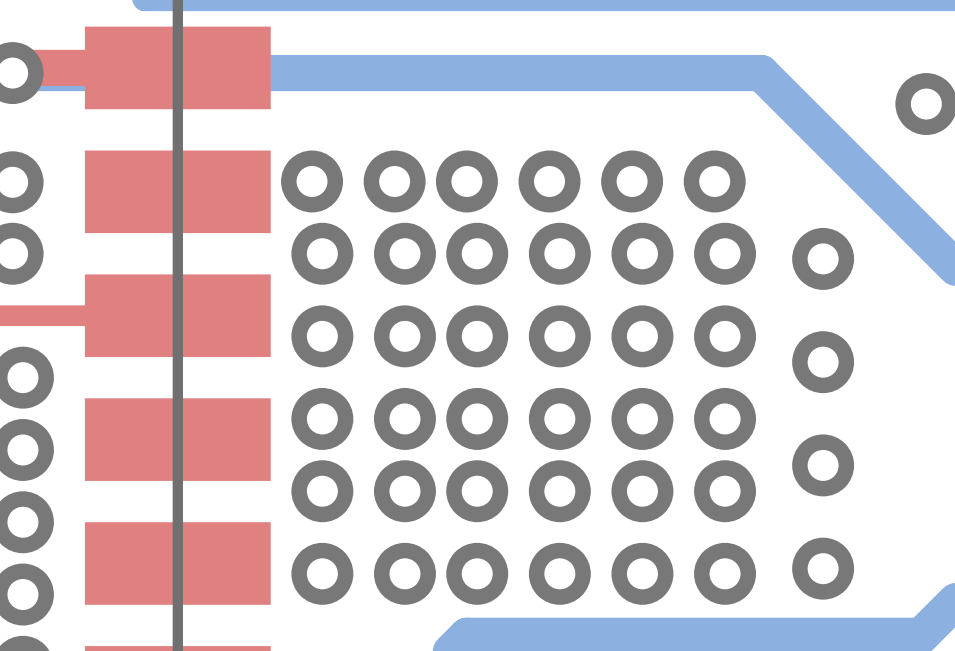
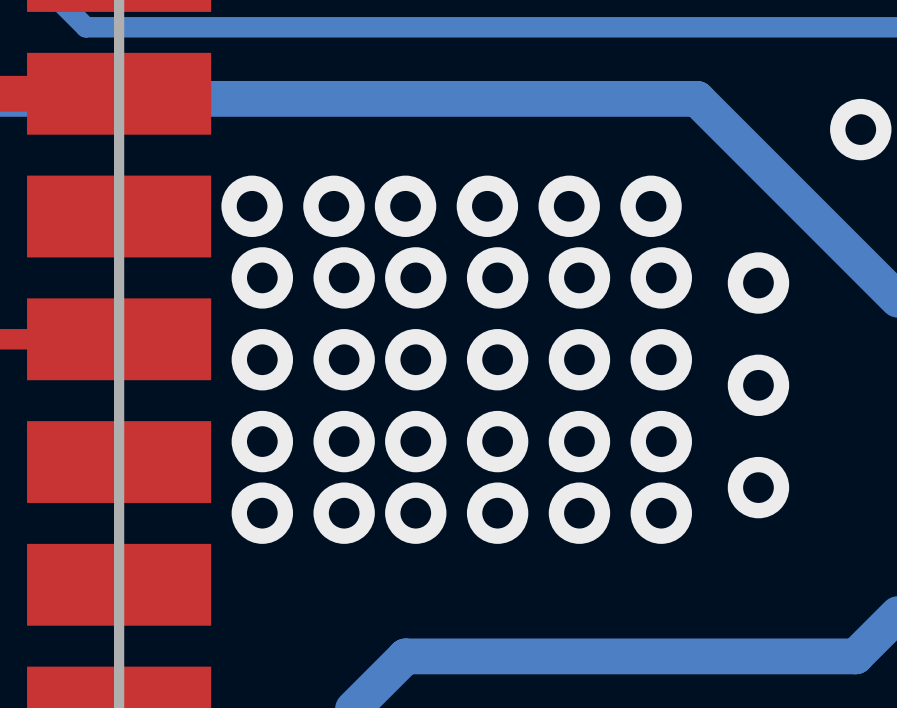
via: (823, 568) -> none
via: (322, 573) -> none
via: (404, 573) -> none
via: (477, 573) -> none
via: (559, 573) -> none
via: (642, 573) -> none
via: (725, 573) -> none

